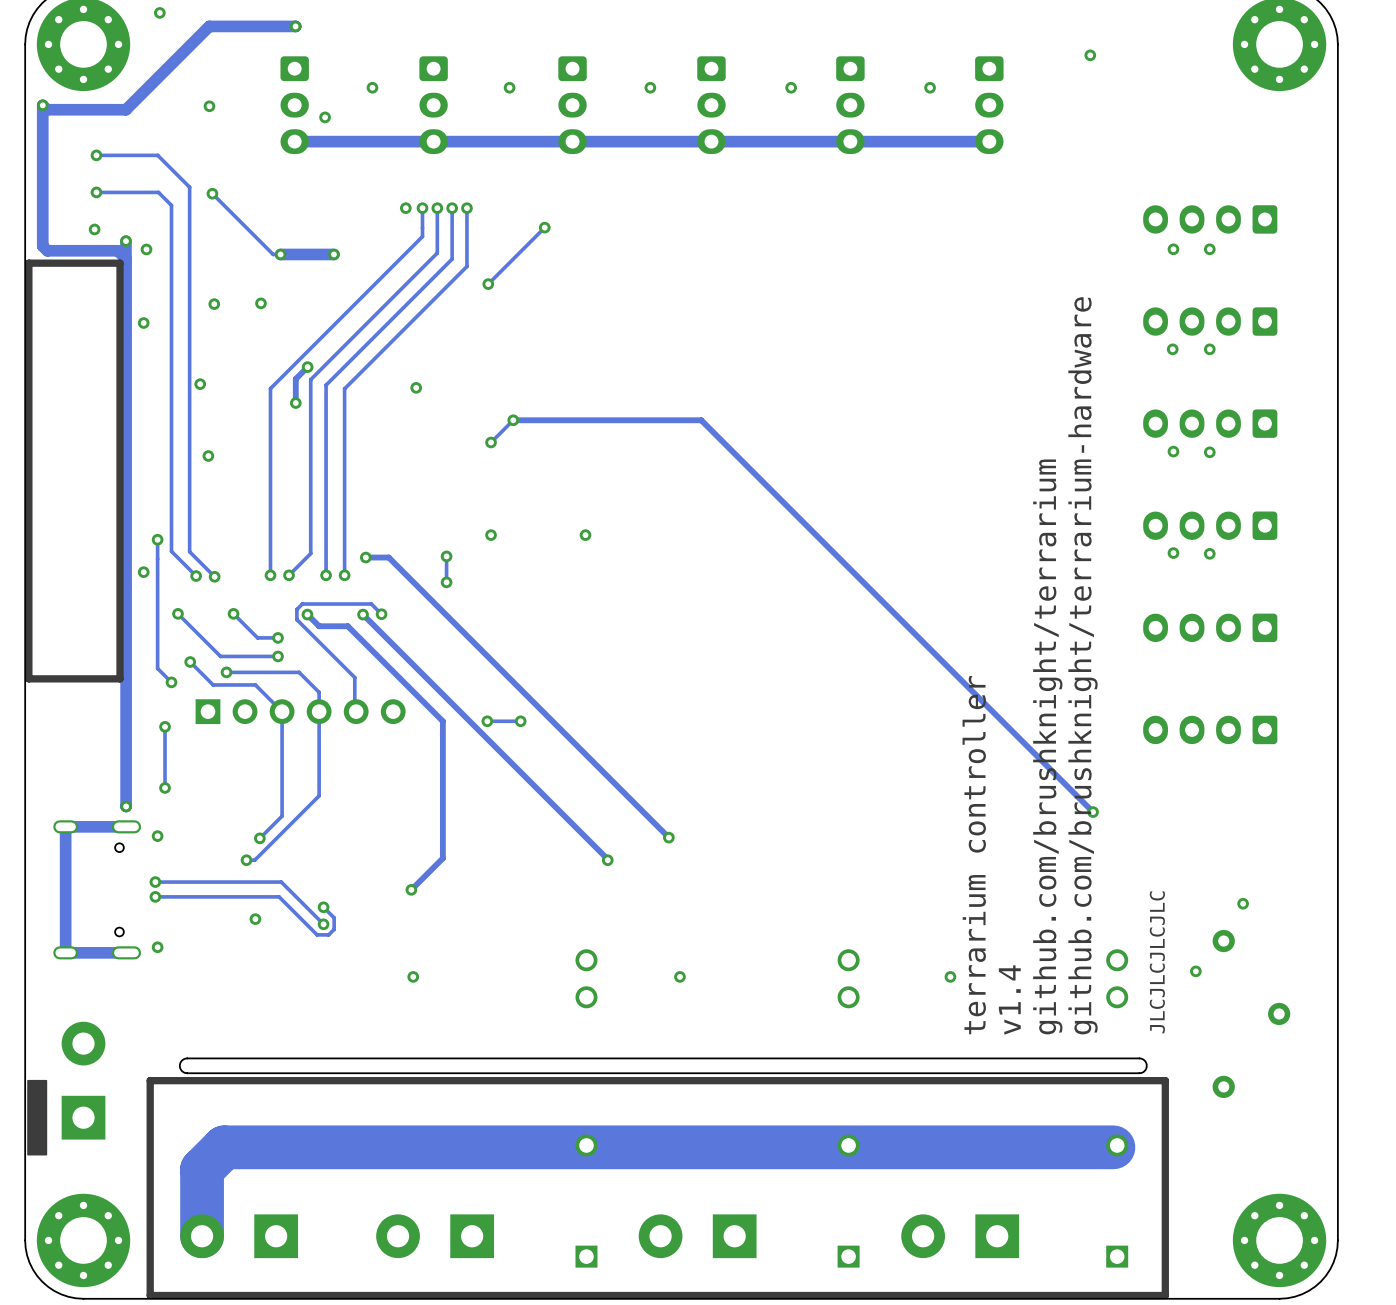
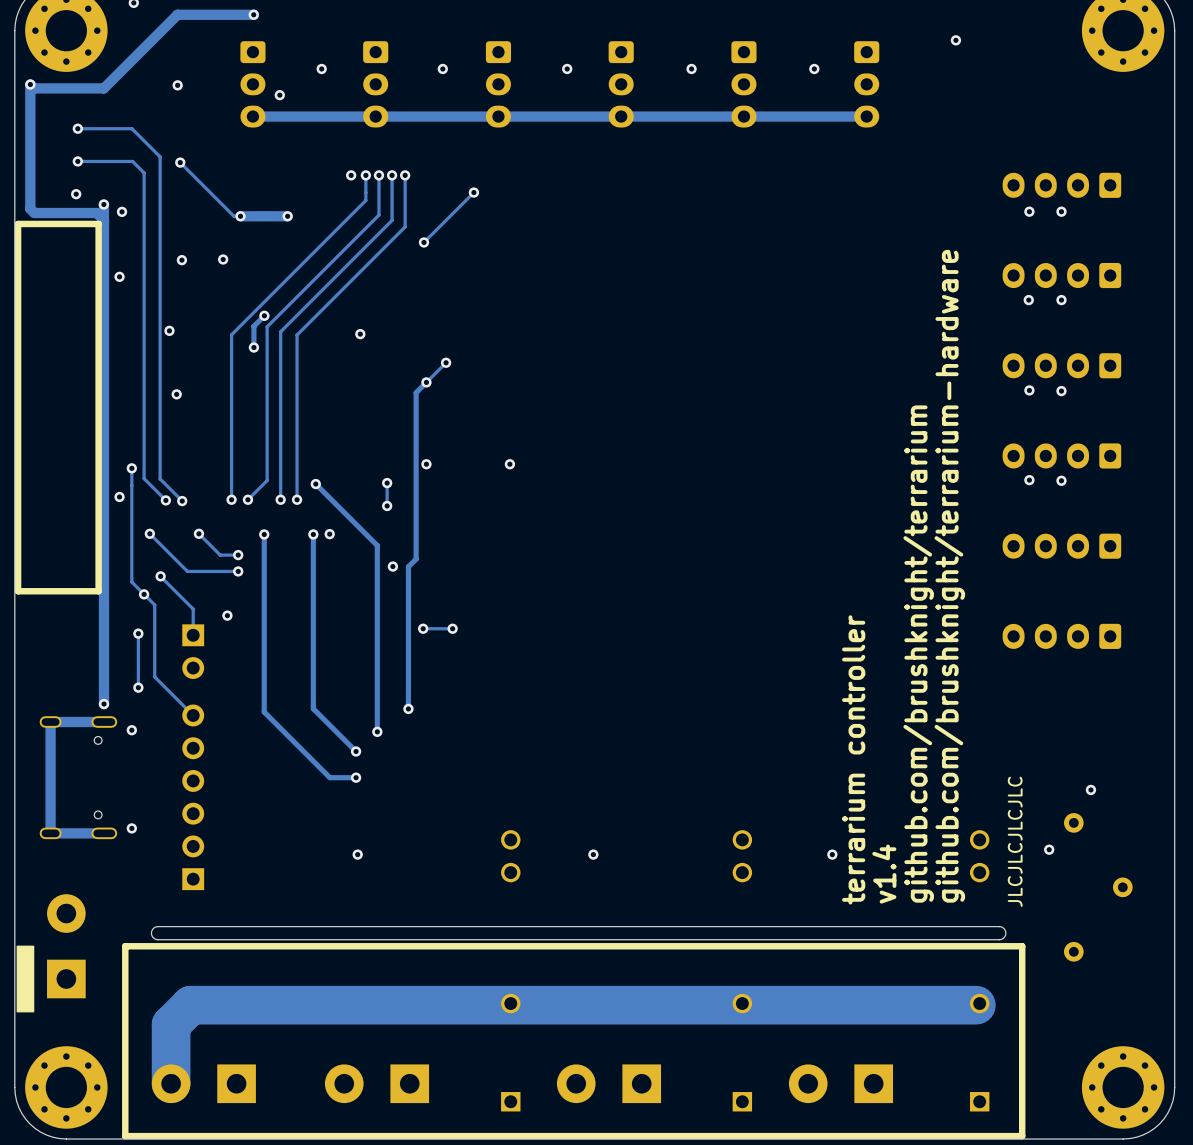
track: (513, 420) (701, 420) (1093, 812) -> none
track: none -> (426, 382) (416, 392) (416, 559) (408, 566) (408, 708)
track: (365, 557) (388, 557) (668, 837) -> (315, 484) (377, 545) (377, 731)
track: (307, 614) (319, 626) (347, 626) (442, 721) (442, 858) (411, 889) -> (264, 534) (264, 712) (329, 777) (356, 777)
track: (363, 614) (608, 860) -> (313, 534) (313, 708) (356, 751)
track: (381, 614) (371, 604) (302, 604) (296, 609) (296, 619) (354, 677) (356, 711) -> none
via: none -> (392, 566)
track: none -> (158, 574) (193, 609) (193, 635)
track: (190, 662) (213, 684) (255, 684) (282, 711) (282, 816) (259, 838) -> none
track: (226, 672) (299, 672) (319, 692) (319, 795) (254, 860) (246, 860) -> none
via position: (226, 672) -> (227, 615)
track: none -> (144, 594) (154, 605) (154, 677) (193, 715)
part rotation: 0° (300, 711) -> 90° counterclockwise (193, 797)
part position: (300, 711) -> (193, 797)
part: none -> (193, 651)
via: none -> (408, 708)
via: (1093, 812) -> none
via: none -> (377, 731)
via: (668, 837) -> none
via: (259, 838) -> none
via: (246, 860) -> none
via: none -> (356, 751)
via: (607, 860) -> none
track: (155, 882) (281, 882) (323, 924) -> none
via: (155, 882) -> none
track: (155, 896) (279, 896) (317, 934) (328, 934) (334, 929) (334, 917) (323, 907) -> none
via: (155, 896) -> none
via: (323, 907) -> none
via: (255, 919) -> none
via: (323, 924) -> none

